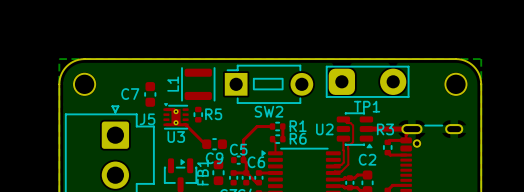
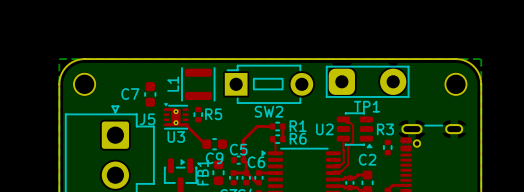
top track: (366, 129) (411, 129) -> none
top track: (411, 129) (406, 134) (406, 140) (389, 140) (387, 142) -> none
top track: (387, 152) (390, 155) (406, 155) -> none

